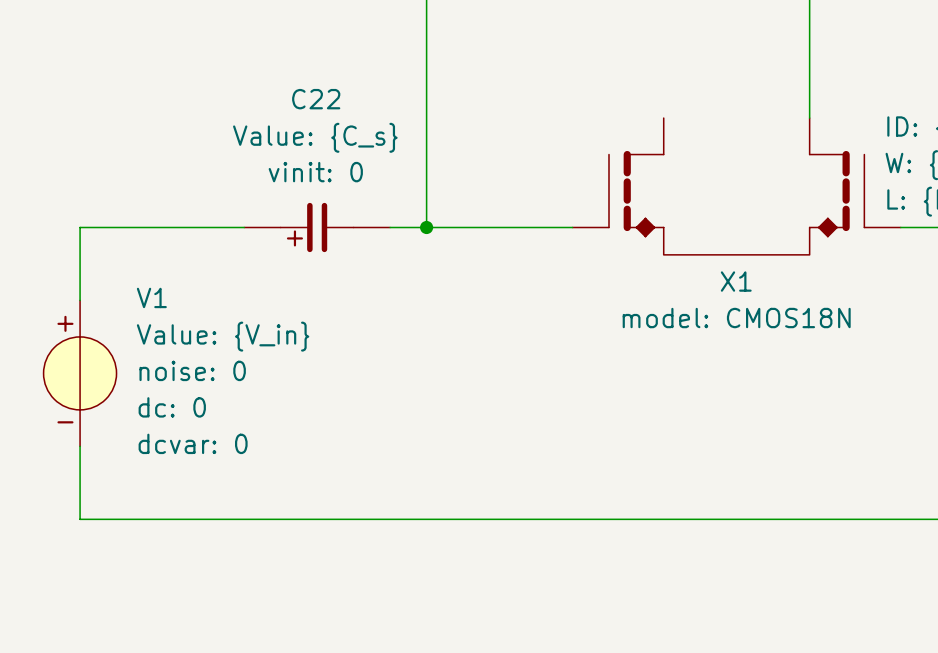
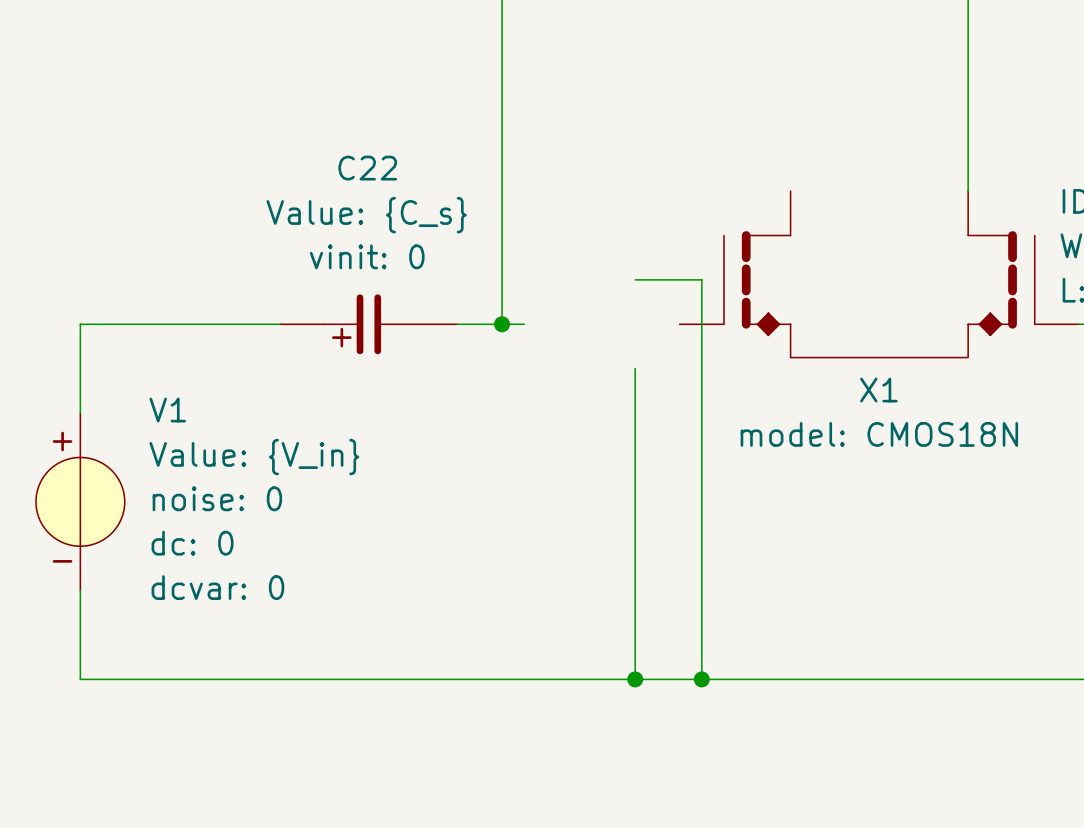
wire: none -> (635, 279) (701, 279) (701, 679)
wire: (444, 227) (572, 227) -> none
wire: none -> (635, 368) (635, 679)
junction: none -> (635, 679)
junction: none -> (701, 679)

